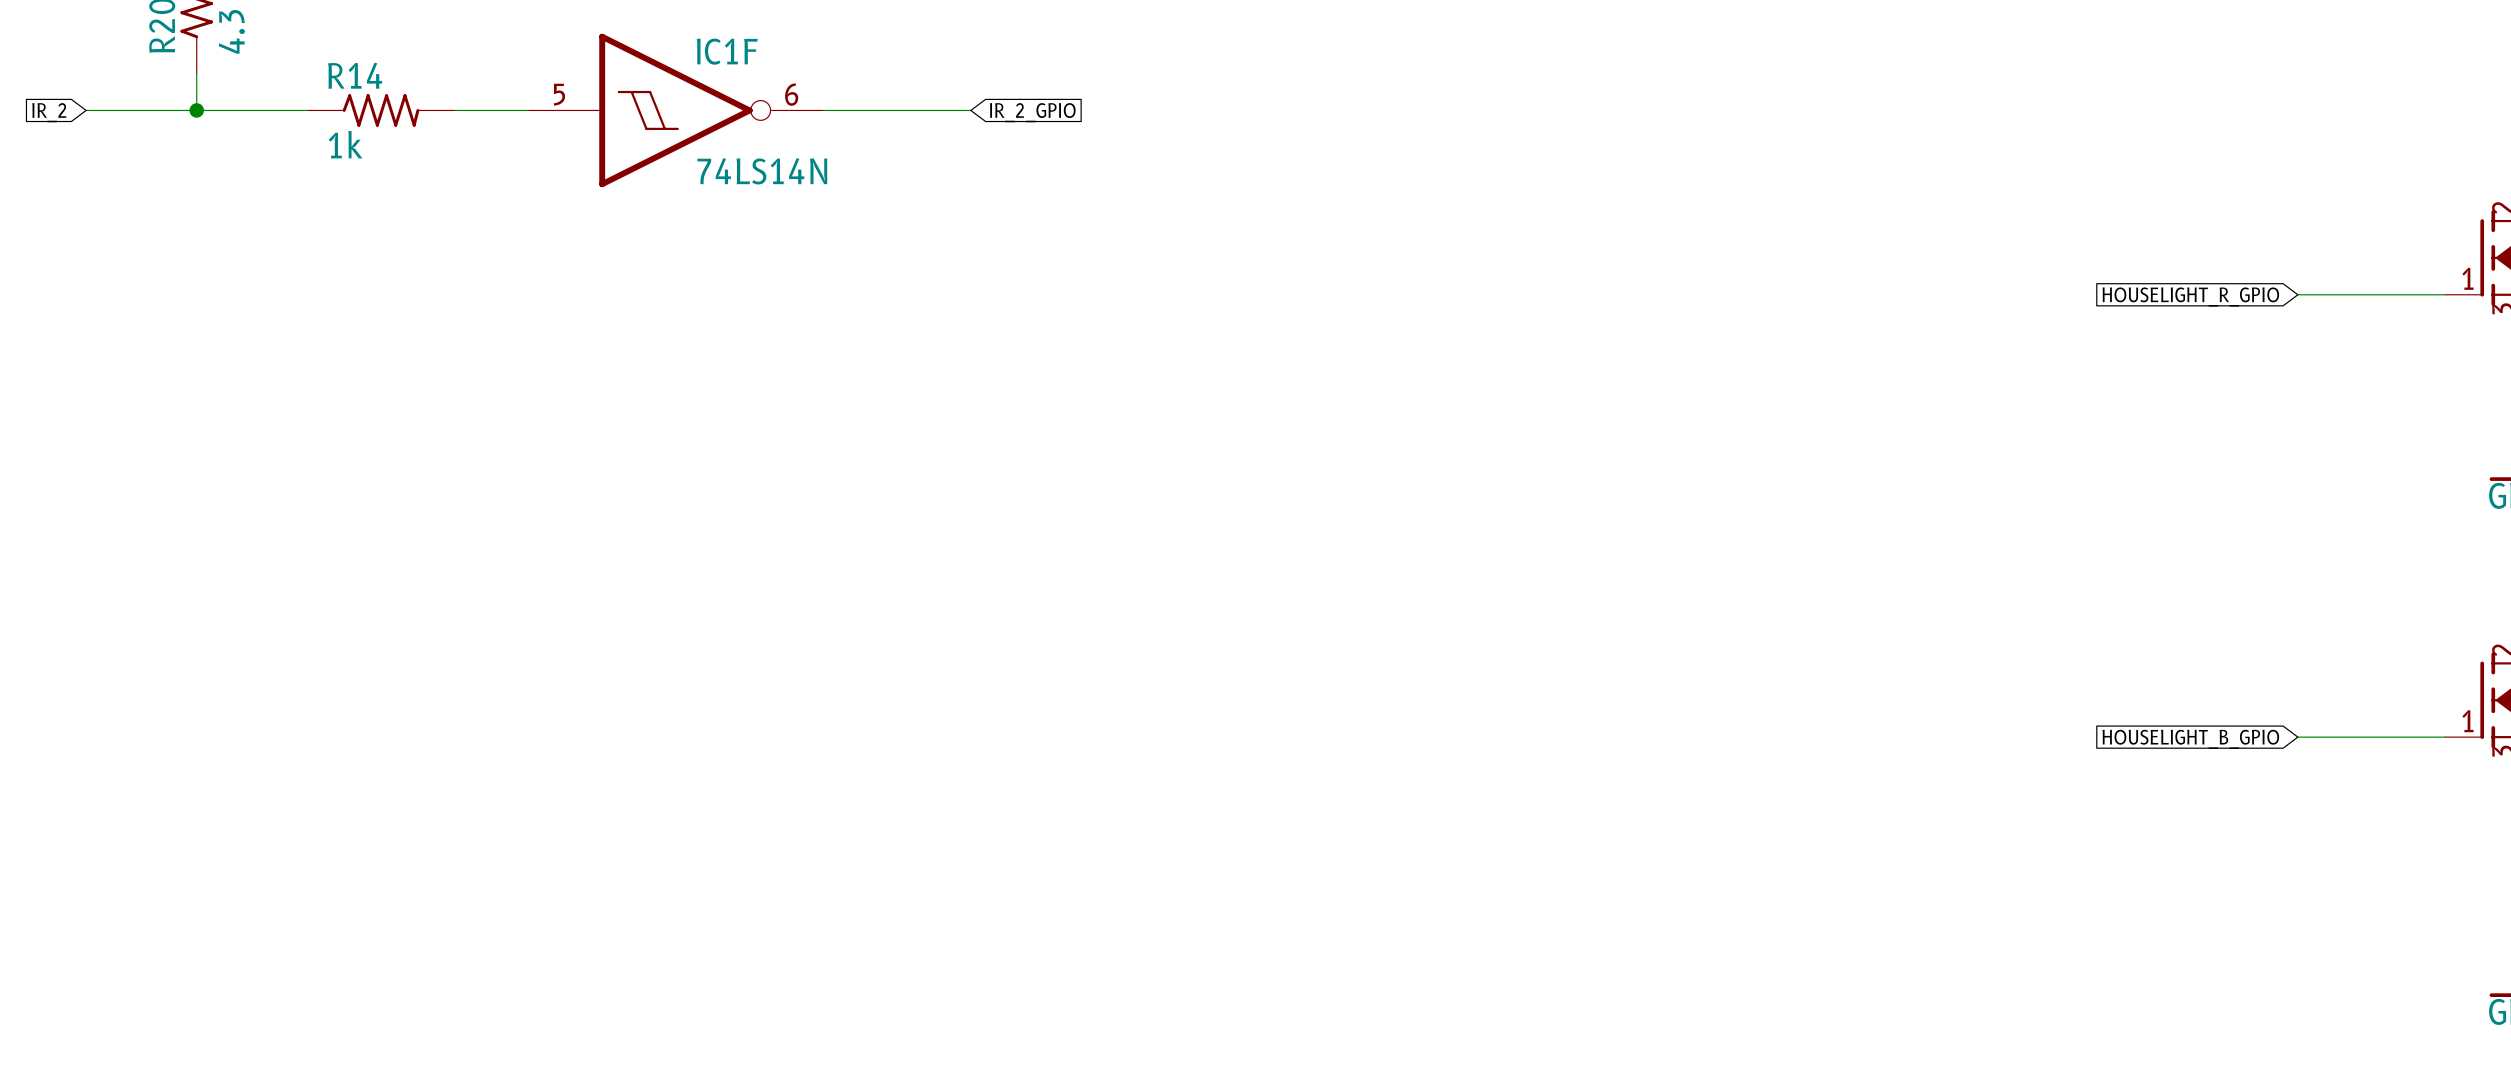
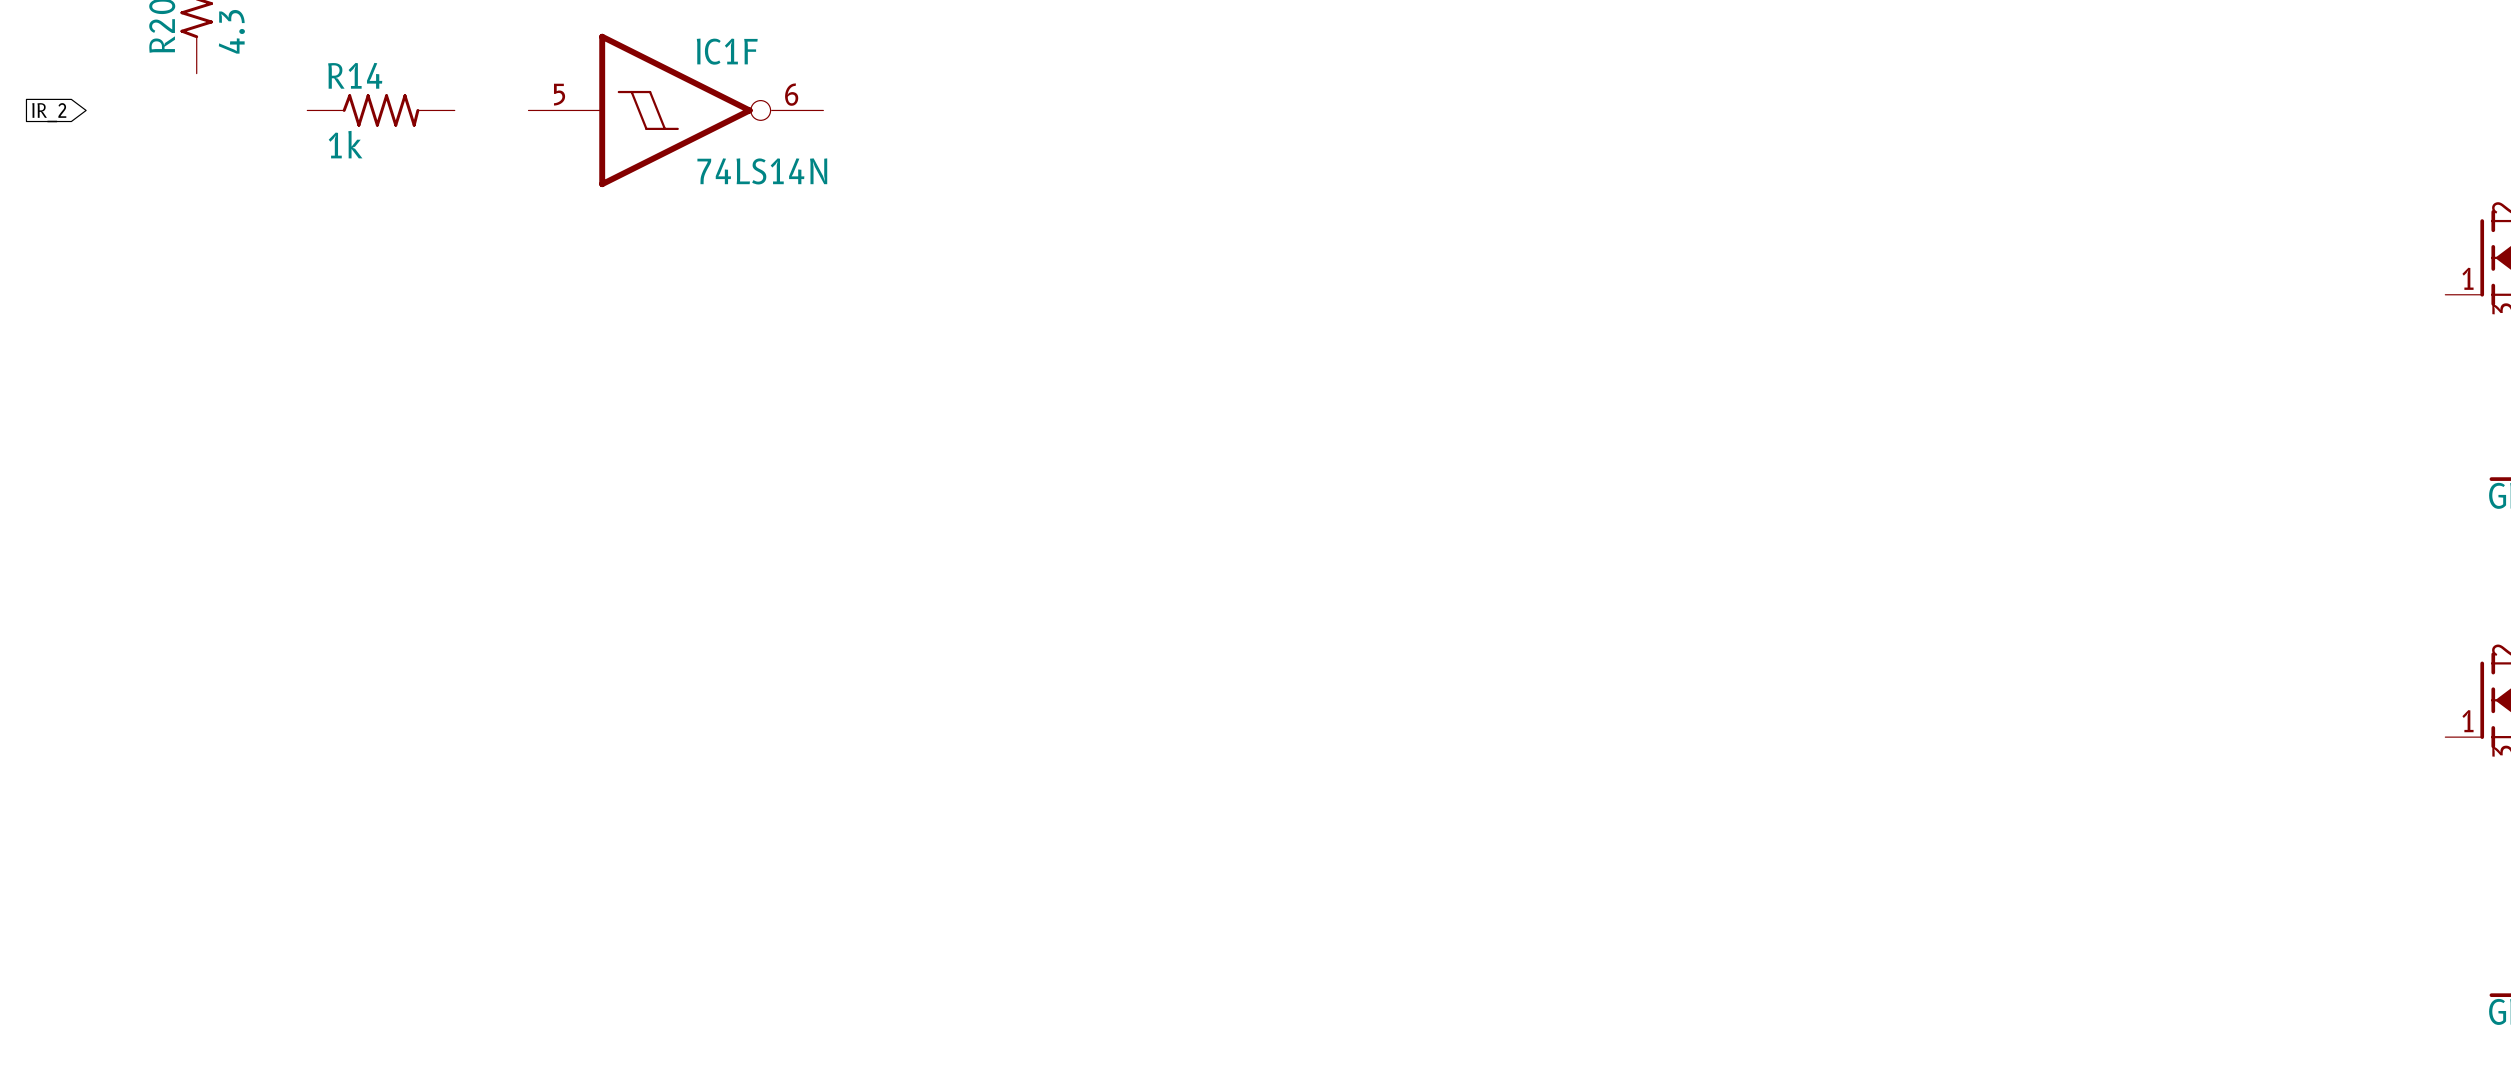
wire: (196, 73) (196, 110) -> none
wire: (86, 110) (307, 110) -> none
junction: (196, 110) -> none
wire: (454, 110) (528, 110) -> none
wire: (823, 110) (970, 110) -> none
global label: IR_2_GPIO (1032, 112) -> none
wire: (2297, 294) (2445, 294) -> none
global label: HOUSELIGHT_R_GPIO (2190, 296) -> none
wire: (2297, 737) (2445, 737) -> none
global label: HOUSELIGHT_B_GPIO (2190, 739) -> none

